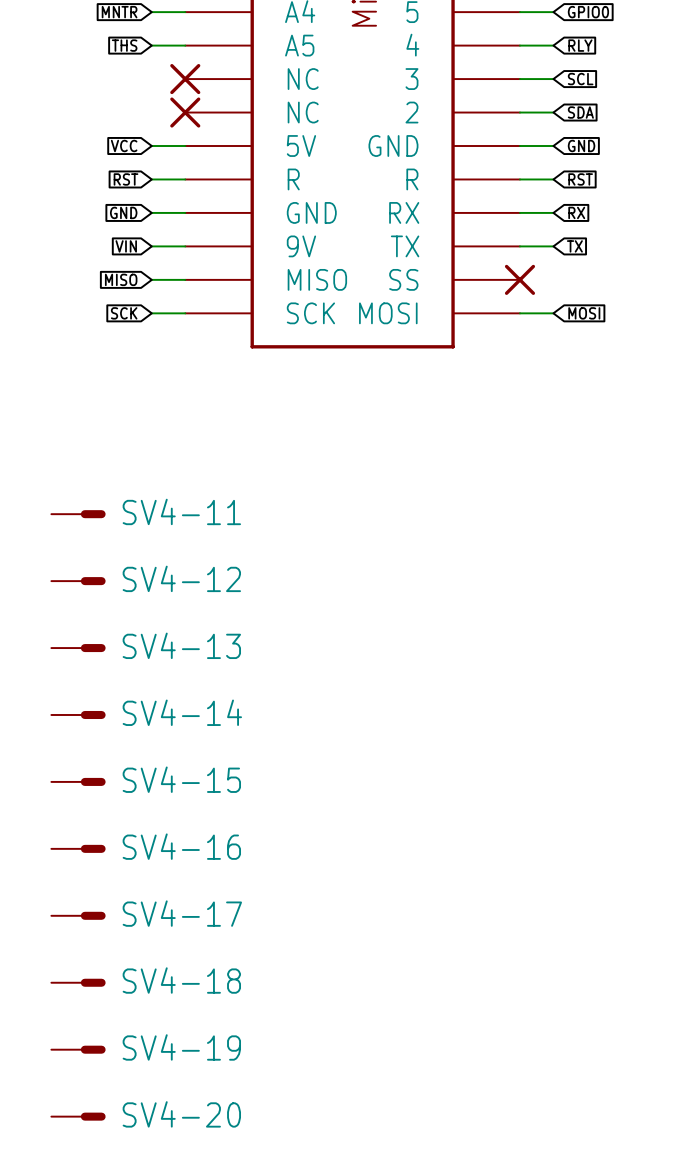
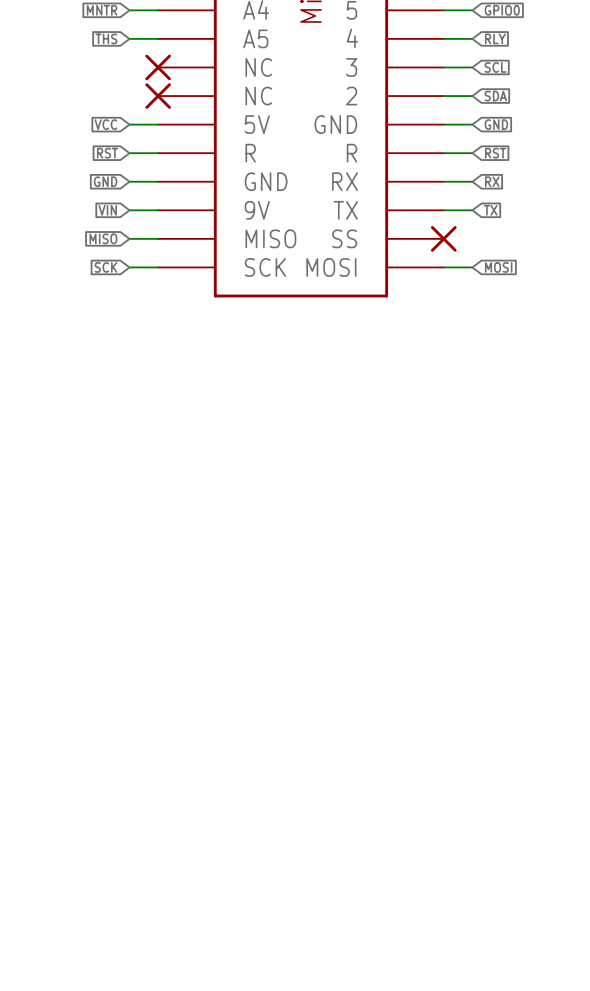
SV4-11: (78, 514) -> none
SV4-12: (78, 581) -> none
SV4-13: (78, 648) -> none
SV4-14: (78, 714) -> none
SV4-15: (78, 781) -> none
SV4-16: (78, 848) -> none
SV4-17: (78, 915) -> none
SV4-18: (78, 982) -> none
SV4-19: (78, 1049) -> none
SV4-20: (78, 1116) -> none

